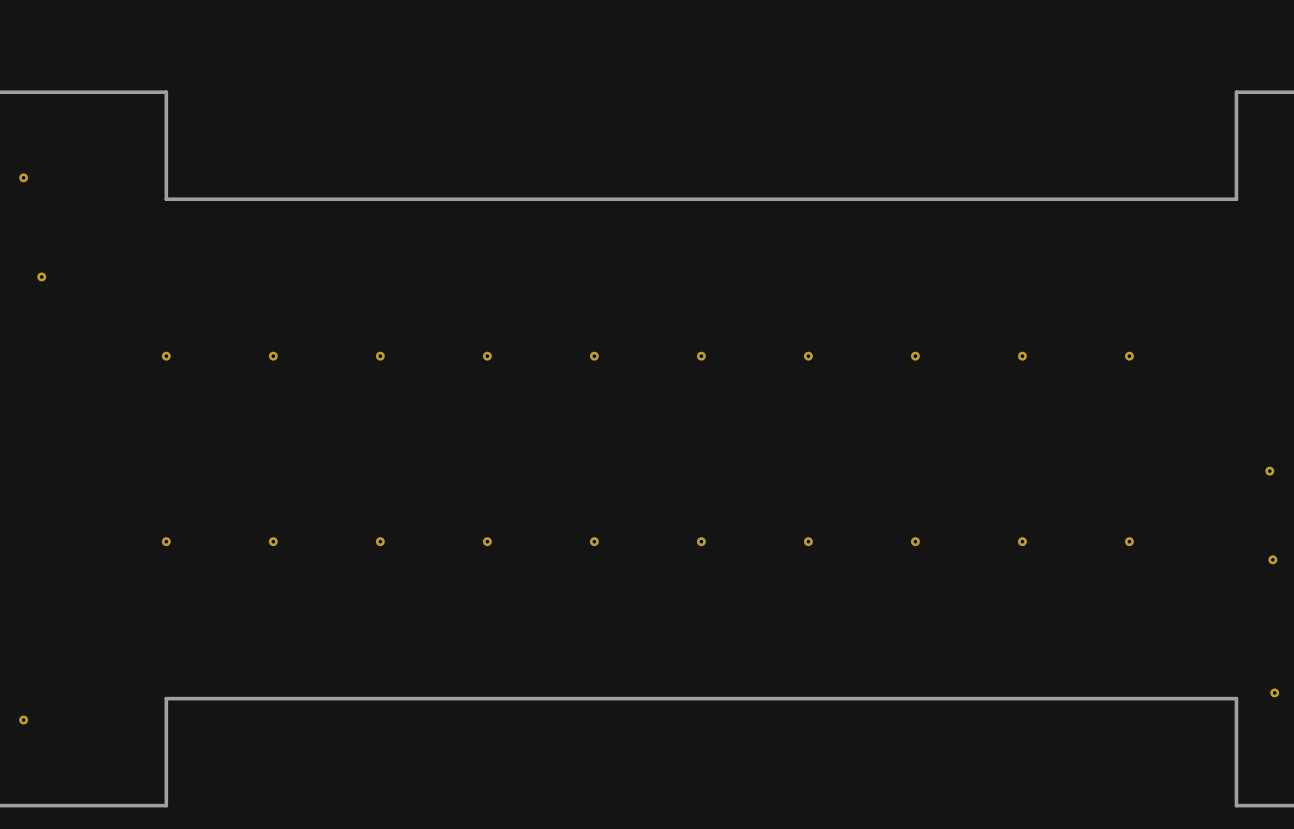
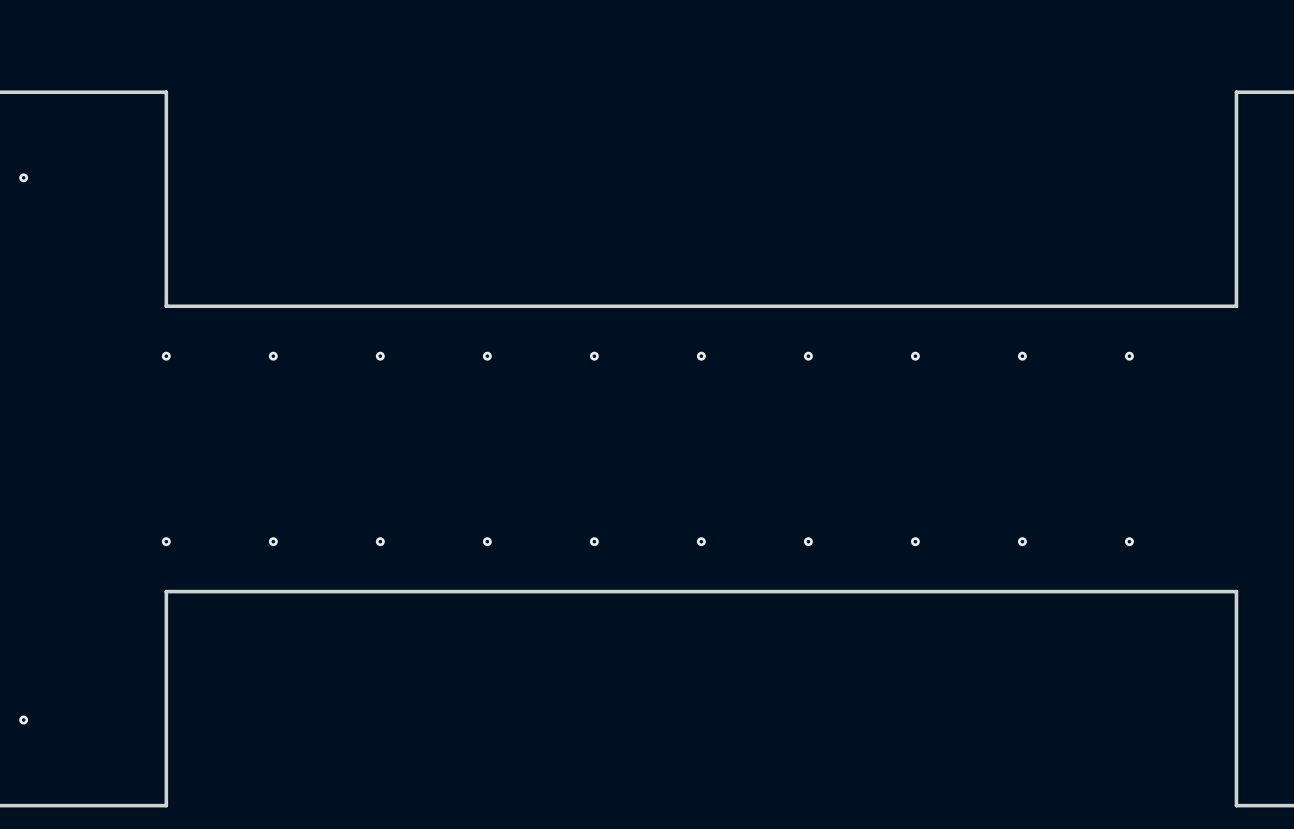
board edge: (1236, 199) (166, 199) -> (1236, 199) (1236, 306) (166, 306) (166, 199)
via: (41, 276) -> none
via: (1269, 471) -> none
via: (1272, 559) -> none
via: (1274, 692) -> none
board edge: (1236, 698) (166, 698) -> (1236, 698) (1236, 591) (166, 591) (166, 698)

